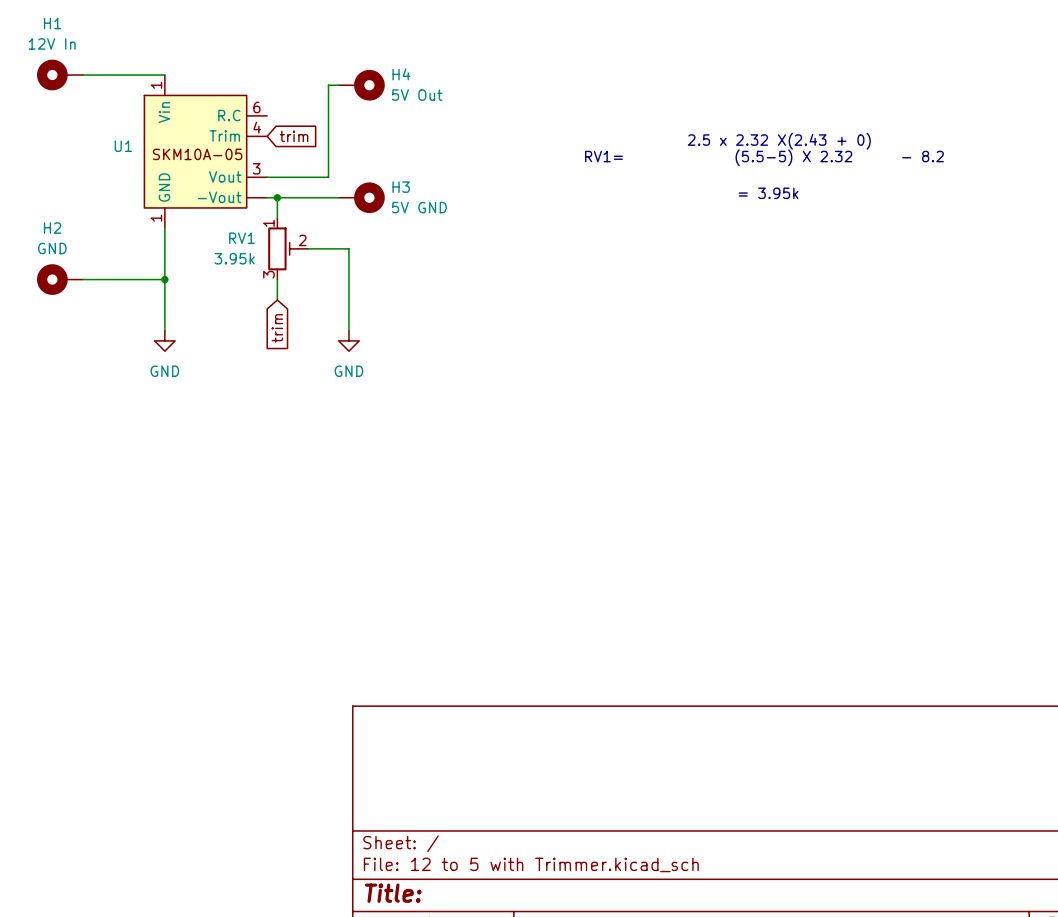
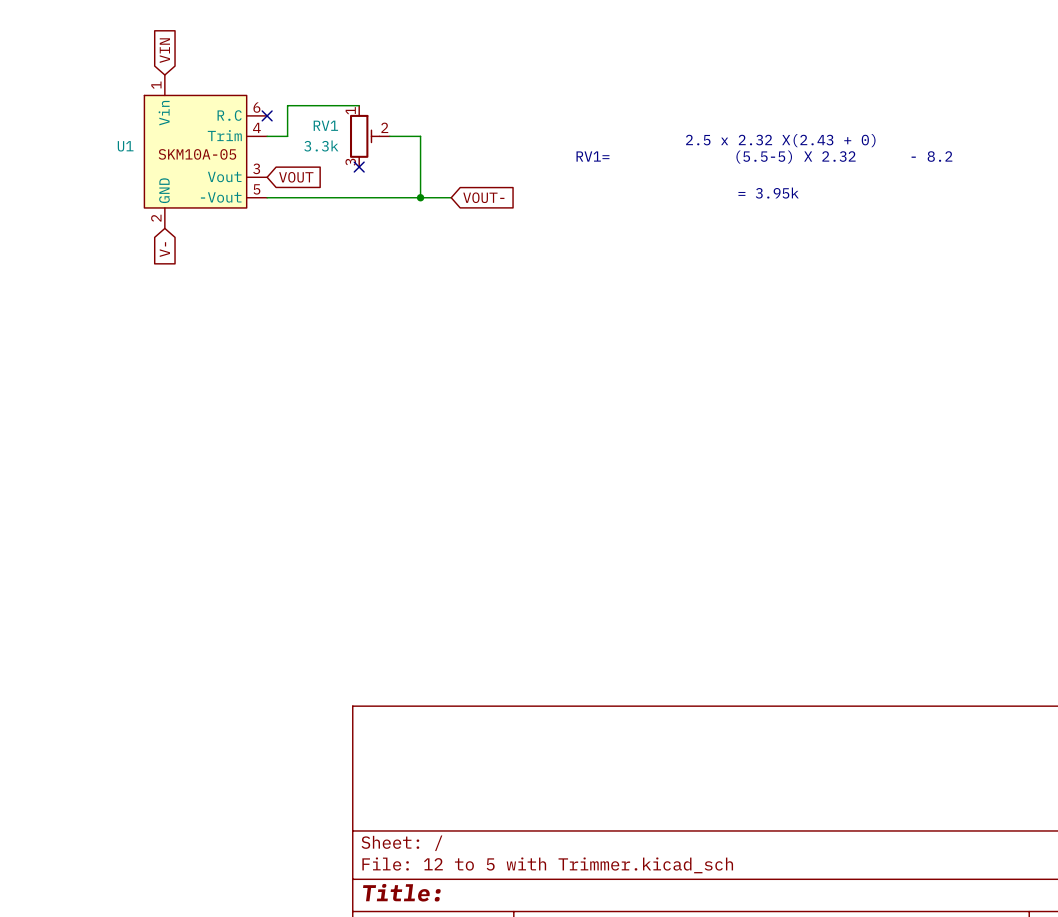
global label: none -> VIN (164, 50)
H1: 12V In (60, 75) -> none
wire: (83, 75) (164, 75) -> none
wire: (338, 85) (328, 85) (328, 177) (267, 177) -> none
H4: 5V Out (361, 85) -> none
wire: none -> (359, 105) (287, 105) (287, 136) (267, 136)
no-connect mark: none -> (267, 115)
global label: trim (294, 136) -> none
wire: none -> (389, 136) (420, 136) (420, 197)
no-connect mark: none -> (359, 167)
global label: none -> VOUT (296, 177)
U1 pin number: none -> 5 (256, 189)
wire: (277, 197) (277, 218) -> none
junction: (277, 197) -> none
wire: none -> (338, 197) (451, 197)
H3: 5V GND (361, 197) -> none
junction: none -> (420, 197)
global label: none -> VOUT- (483, 197)
U1 pin number: 1 (156, 218) -> 2 (156, 218)
wire: (164, 228) (164, 330) -> none
RV1 position: (288, 248) -> (369, 136)
wire: (308, 248) (348, 248) (348, 330) -> none
global label: none -> V- (164, 249)
RV1 value: 3.95k (234, 258) -> 3.3k (321, 146)
H2: GND (60, 279) -> none
wire: (83, 279) (164, 279) -> none
junction: (164, 279) -> none
wire: (277, 279) (277, 300) -> none
global label: trim (277, 328) -> none
power symbol: GND (164, 340) -> none
power symbol: GND (348, 340) -> none

